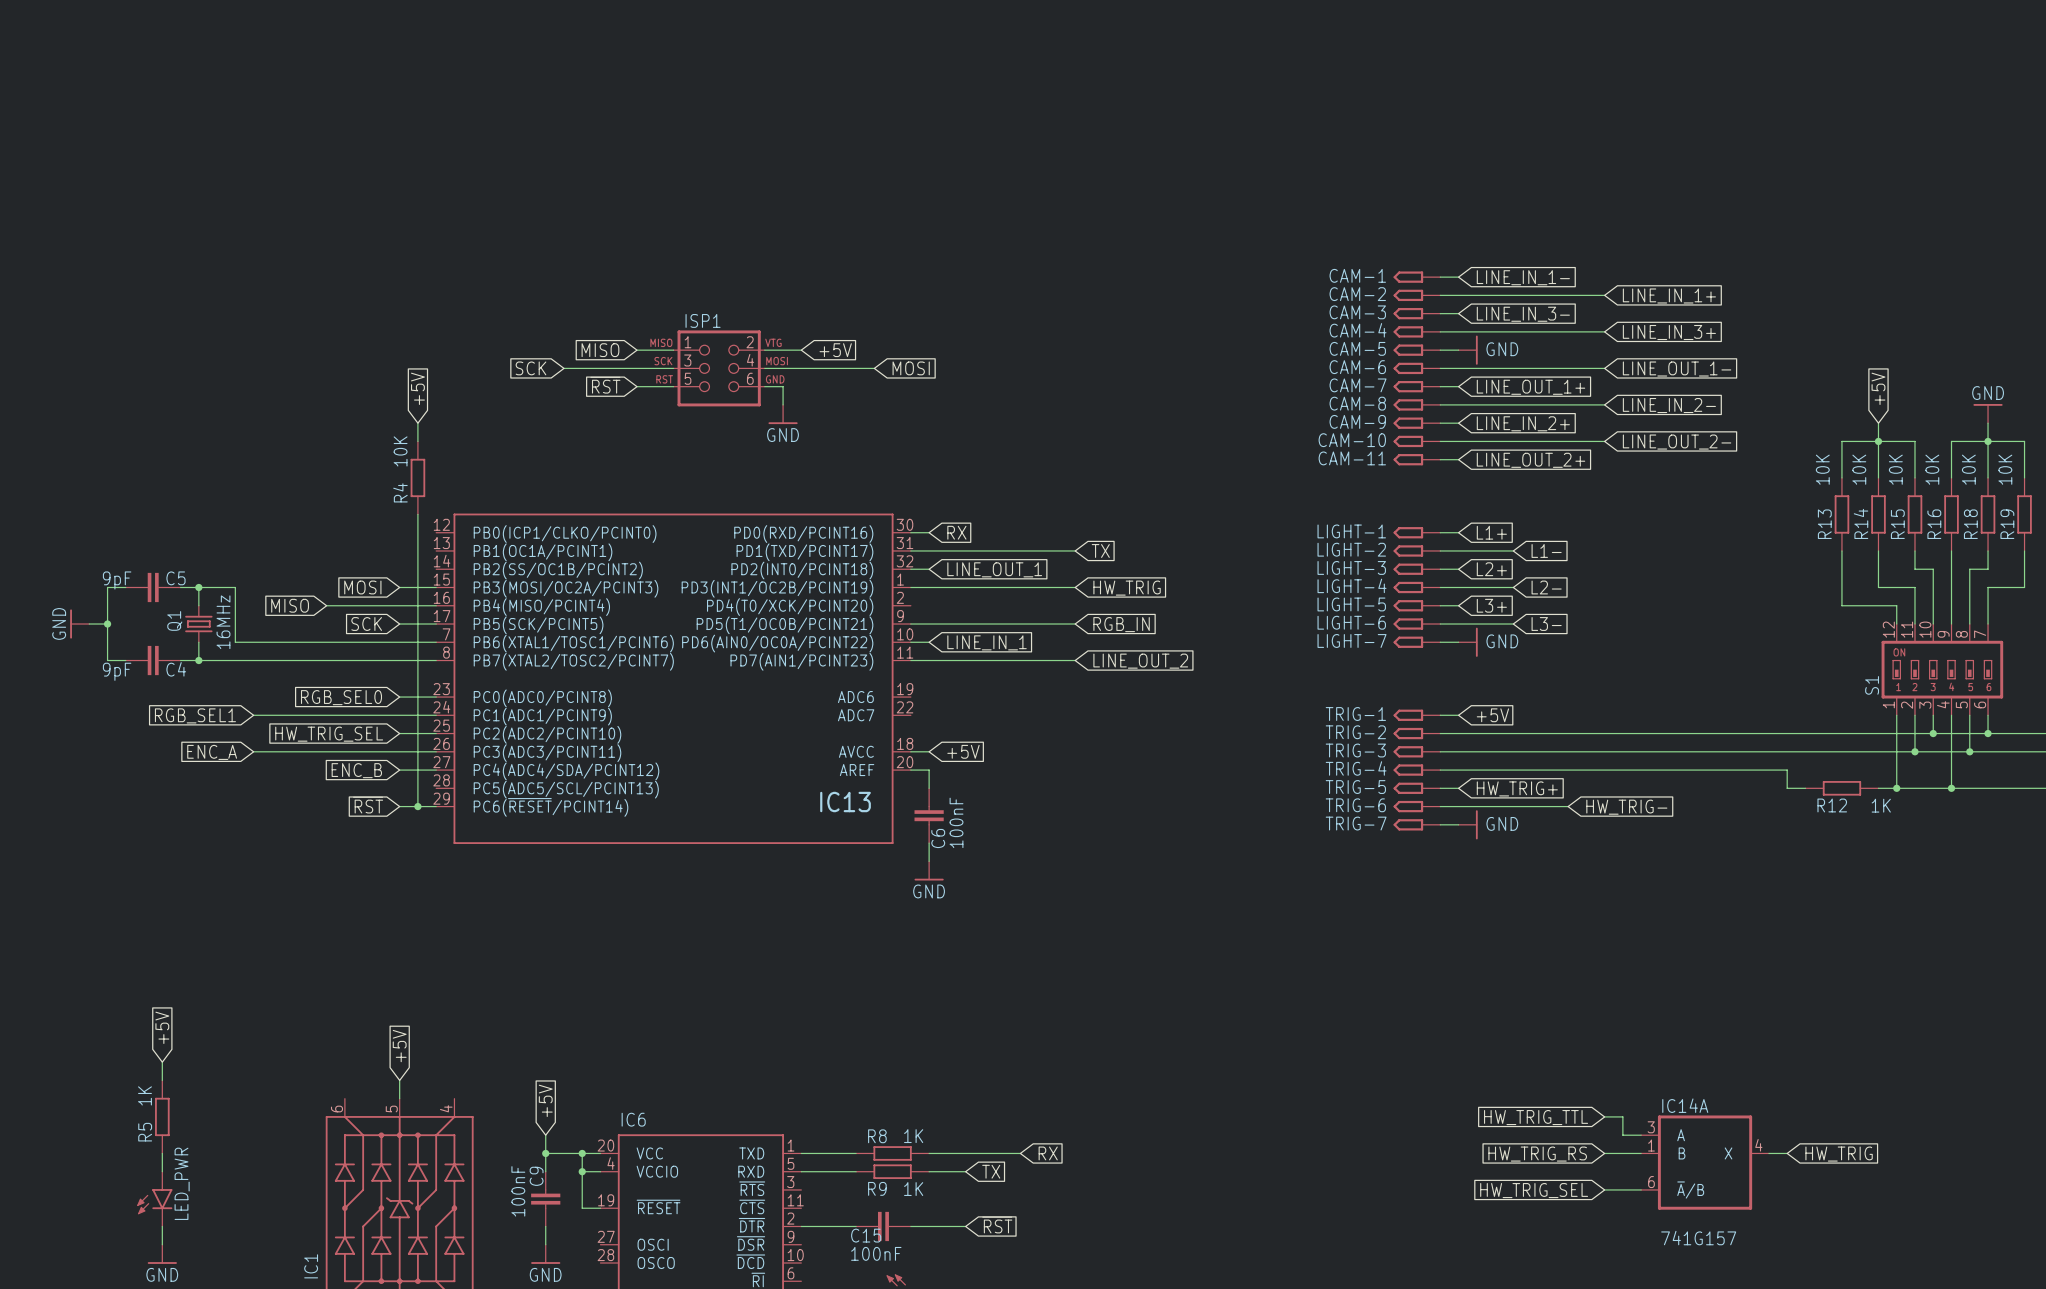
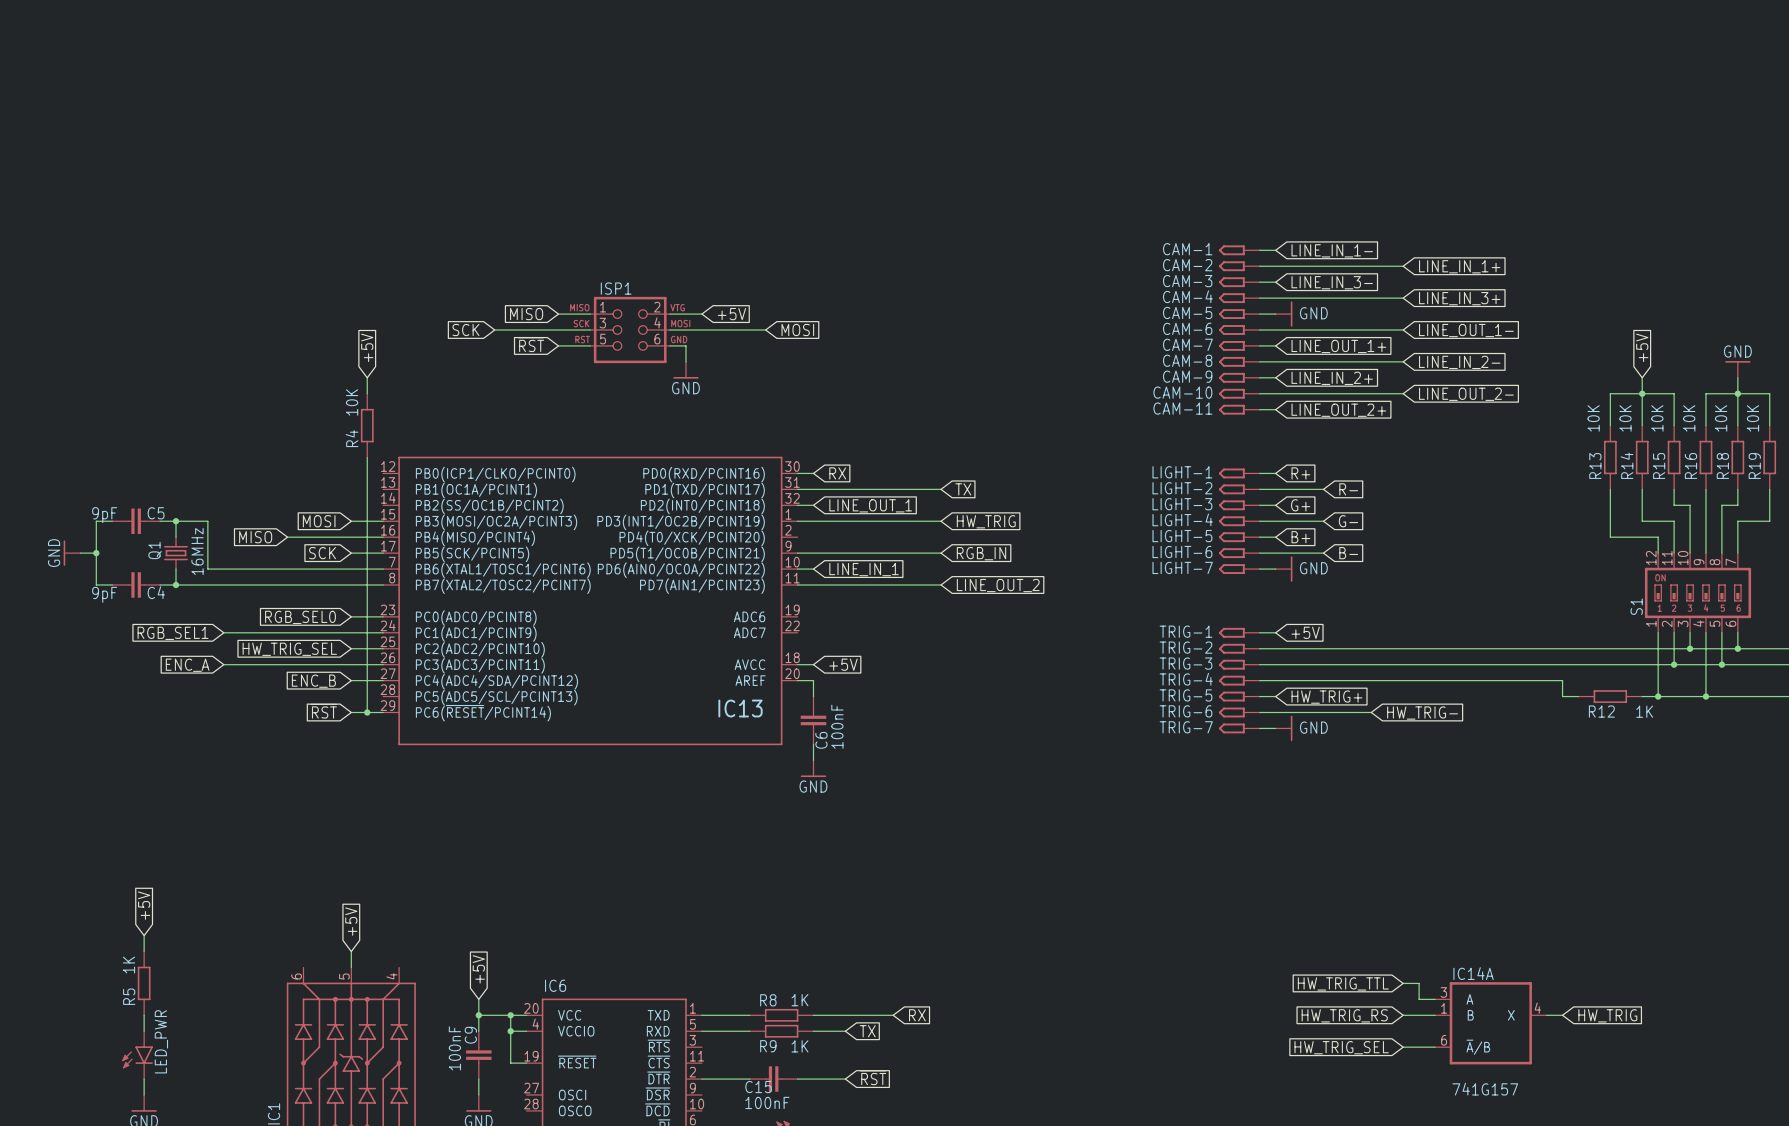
global label: L1+ (1491, 532) -> R+ (1300, 473)
global label: L1- (1546, 550) -> R- (1348, 489)
global label: L2+ (1491, 569) -> G+ (1300, 505)
global label: L2- (1546, 587) -> G- (1348, 521)
global label: L3+ (1491, 605) -> B+ (1300, 537)
global label: L3- (1546, 624) -> B- (1348, 553)

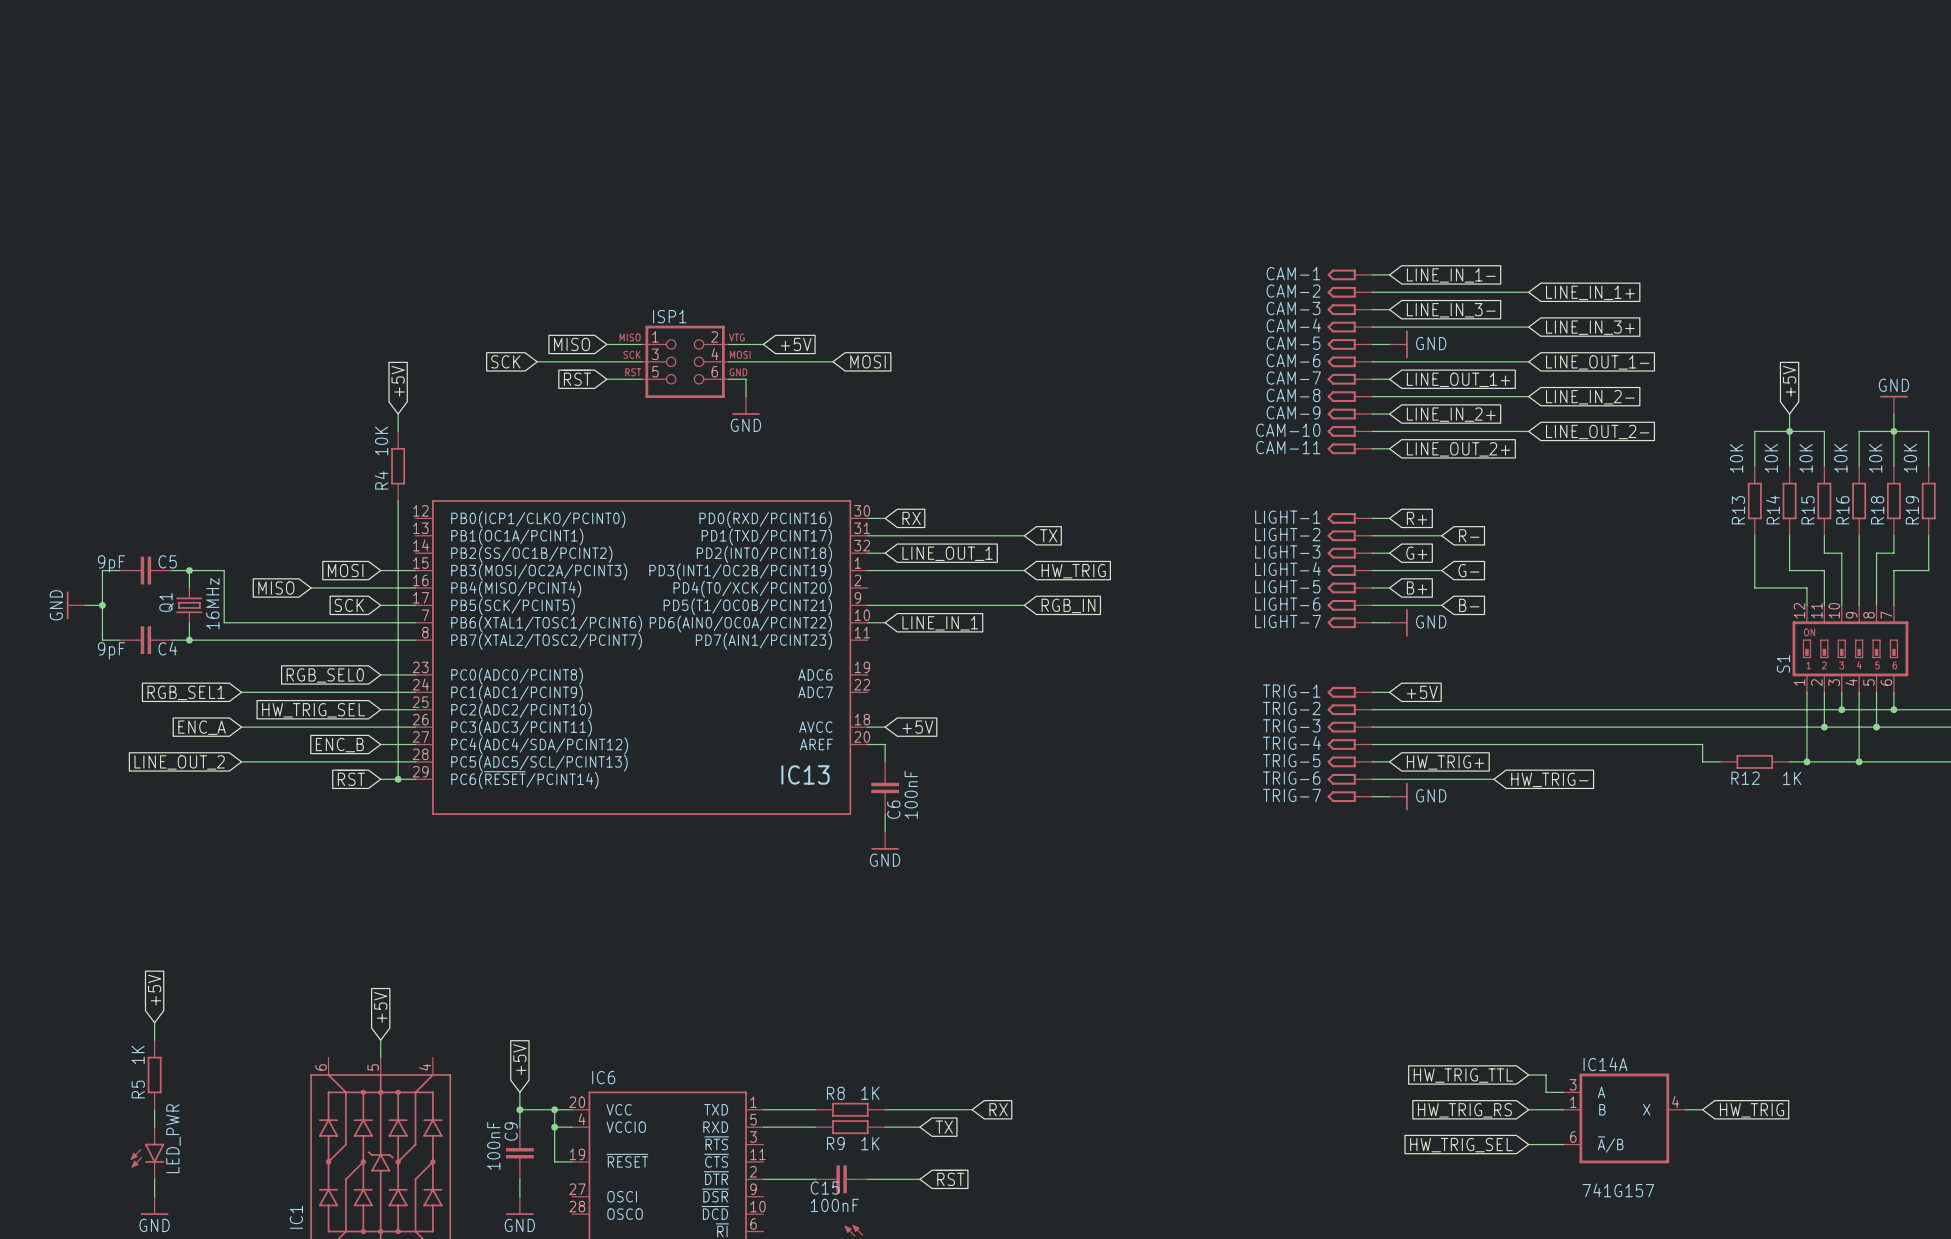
wire: (797, 584) (940, 584) -> none
global label: LINE_OUT_2 (998, 585) -> none
wire: none -> (241, 761) (415, 761)
global label: none -> LINE_OUT_2 (179, 762)

